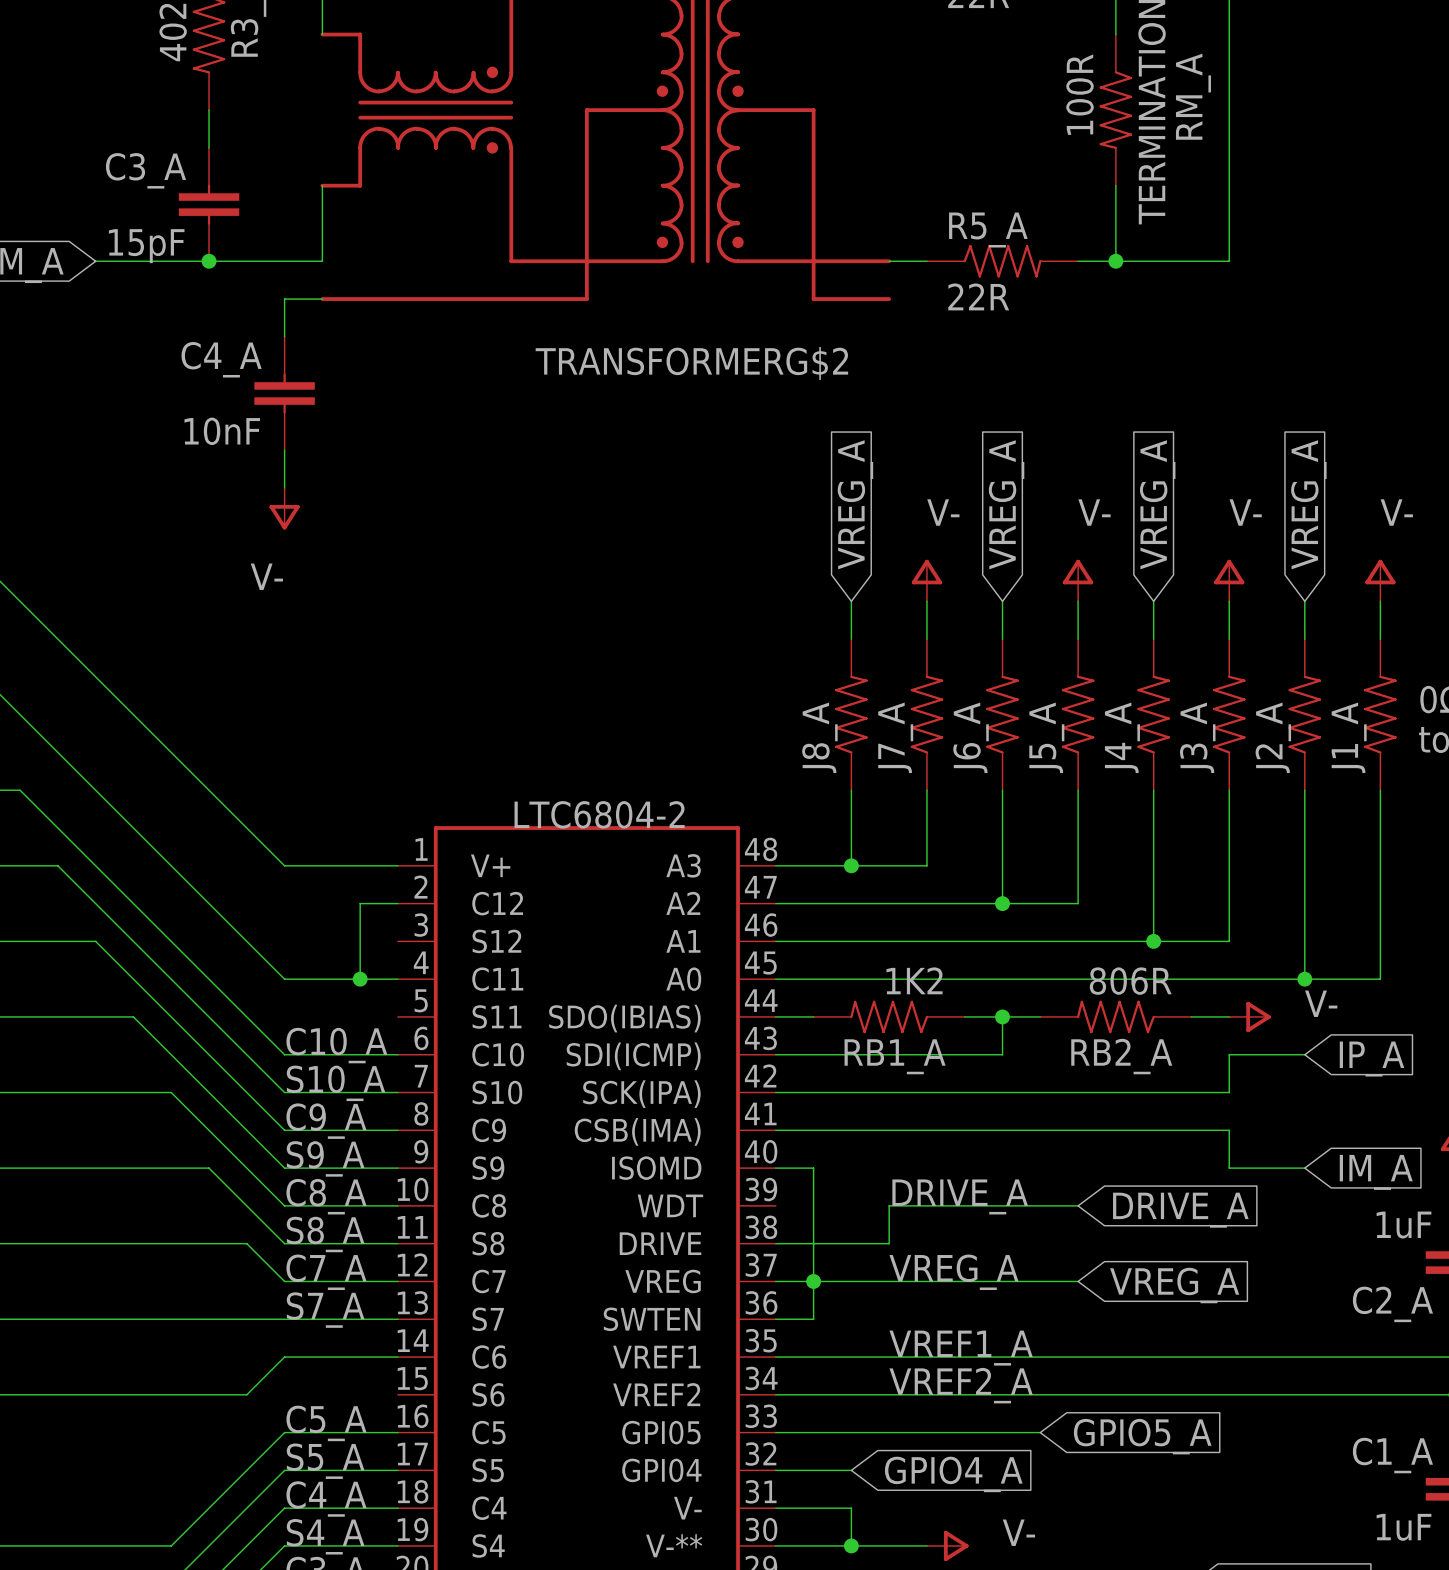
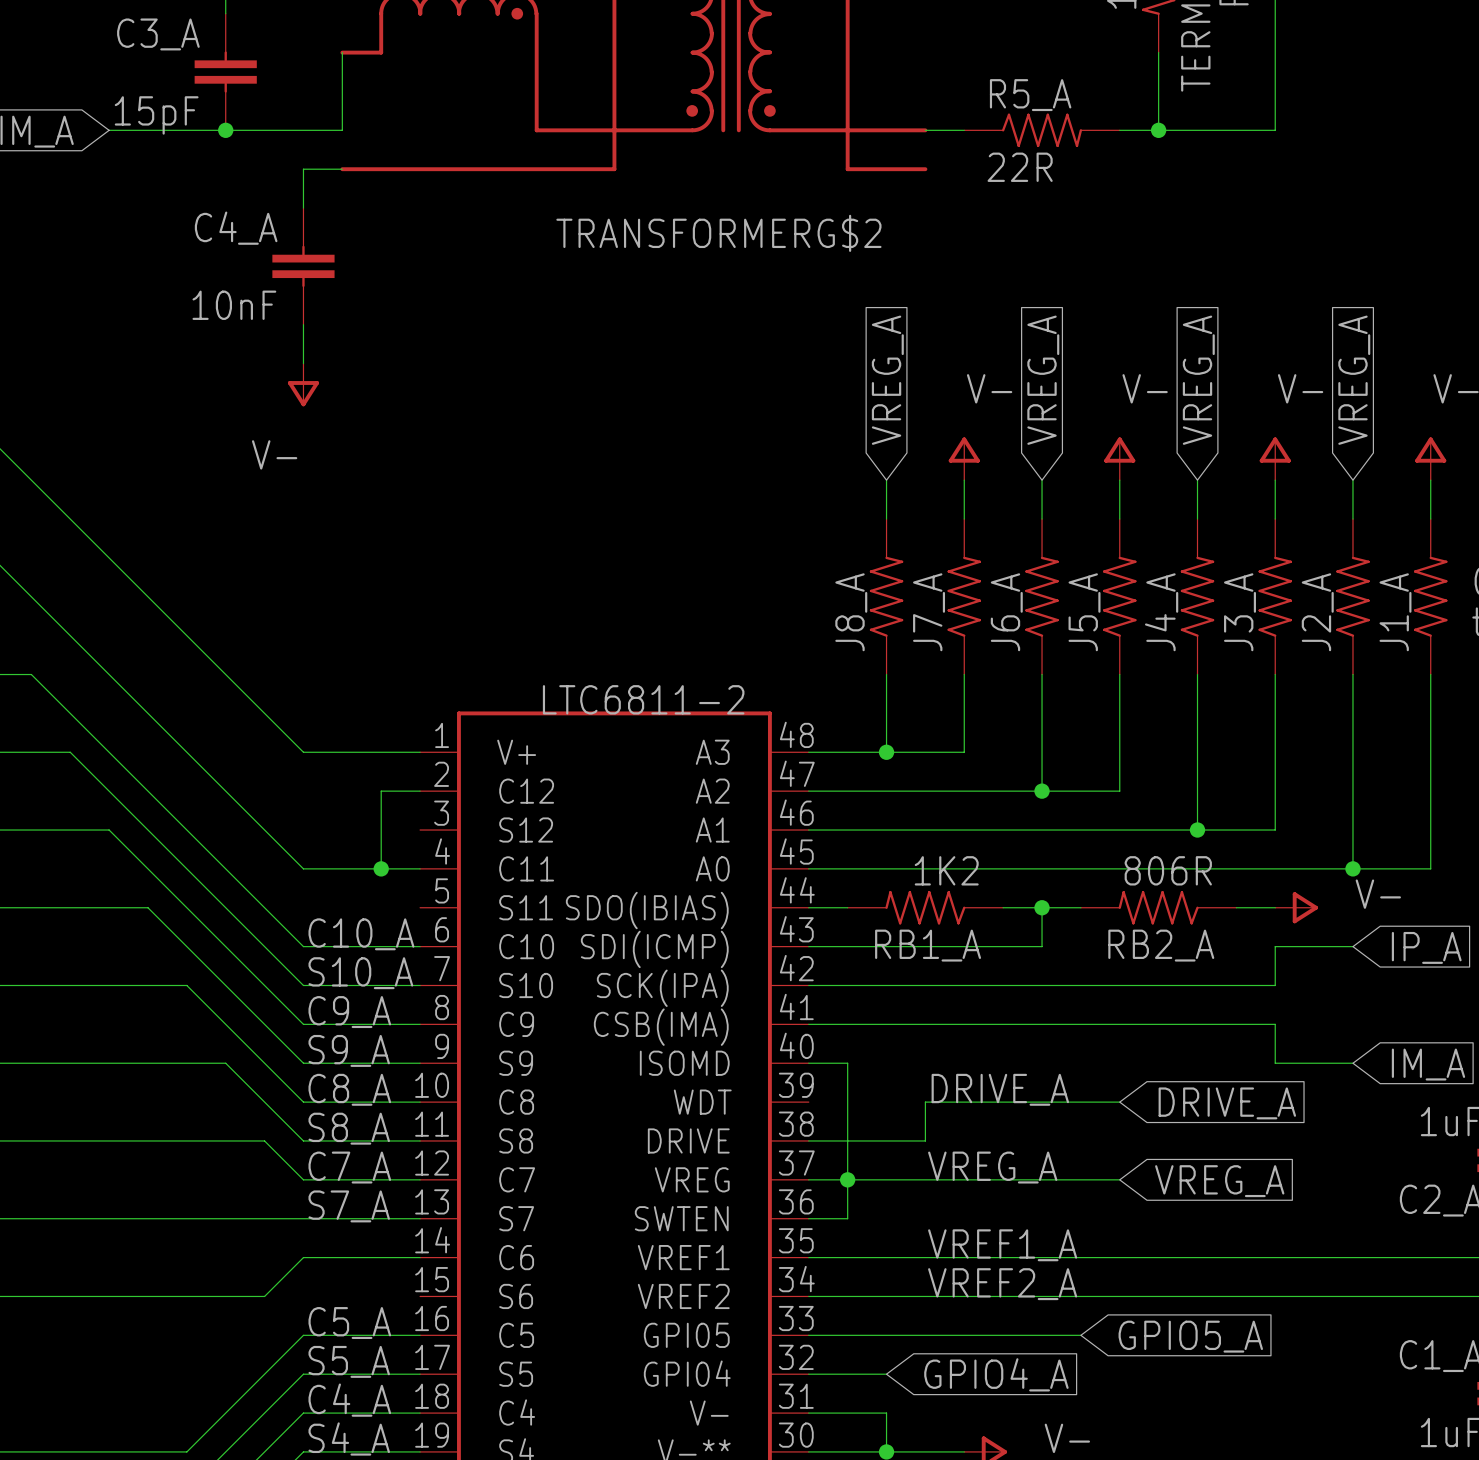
text: LTC6804-2 (599, 814) -> LTC6811-2 (643, 699)

